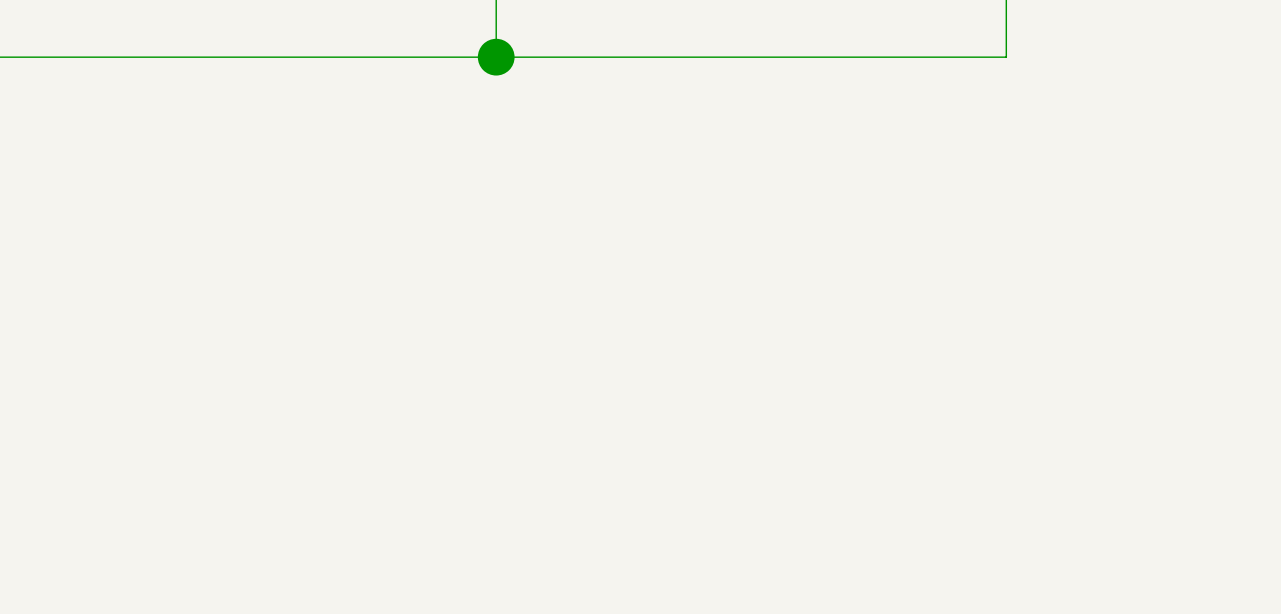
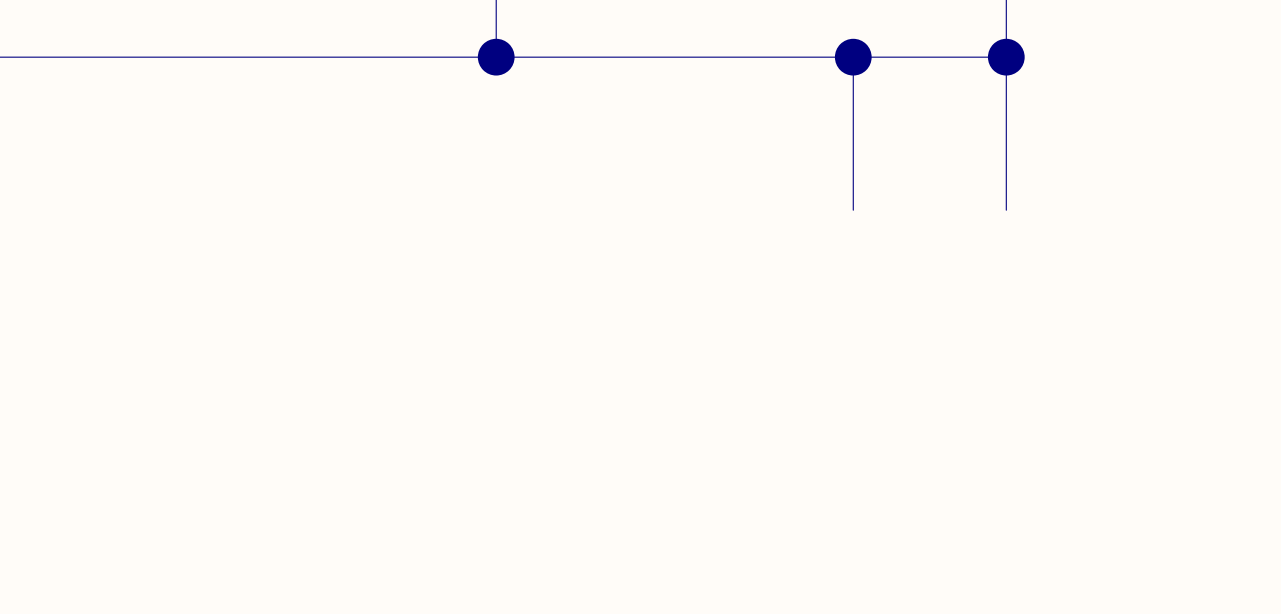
wire: none -> (853, 57) (853, 210)
junction: none -> (853, 57)
wire: none -> (1006, 57) (1006, 210)
junction: none -> (1006, 57)

